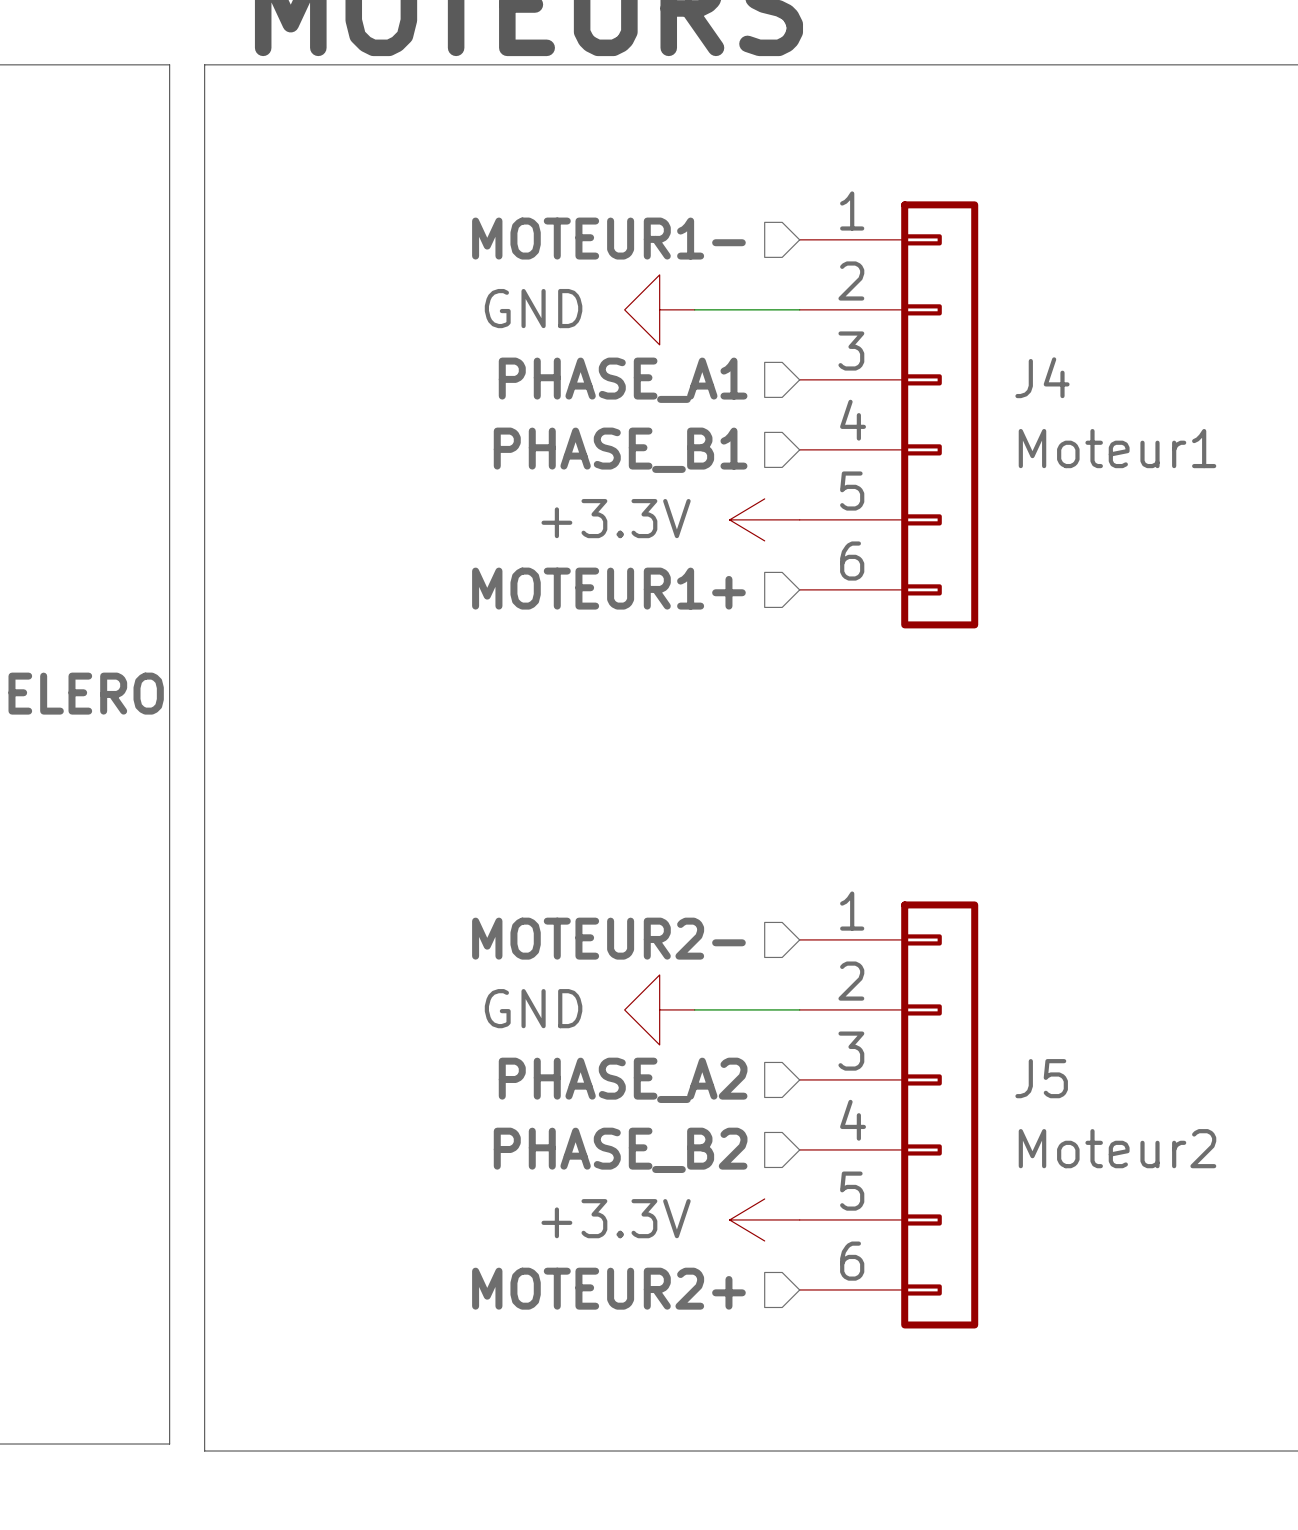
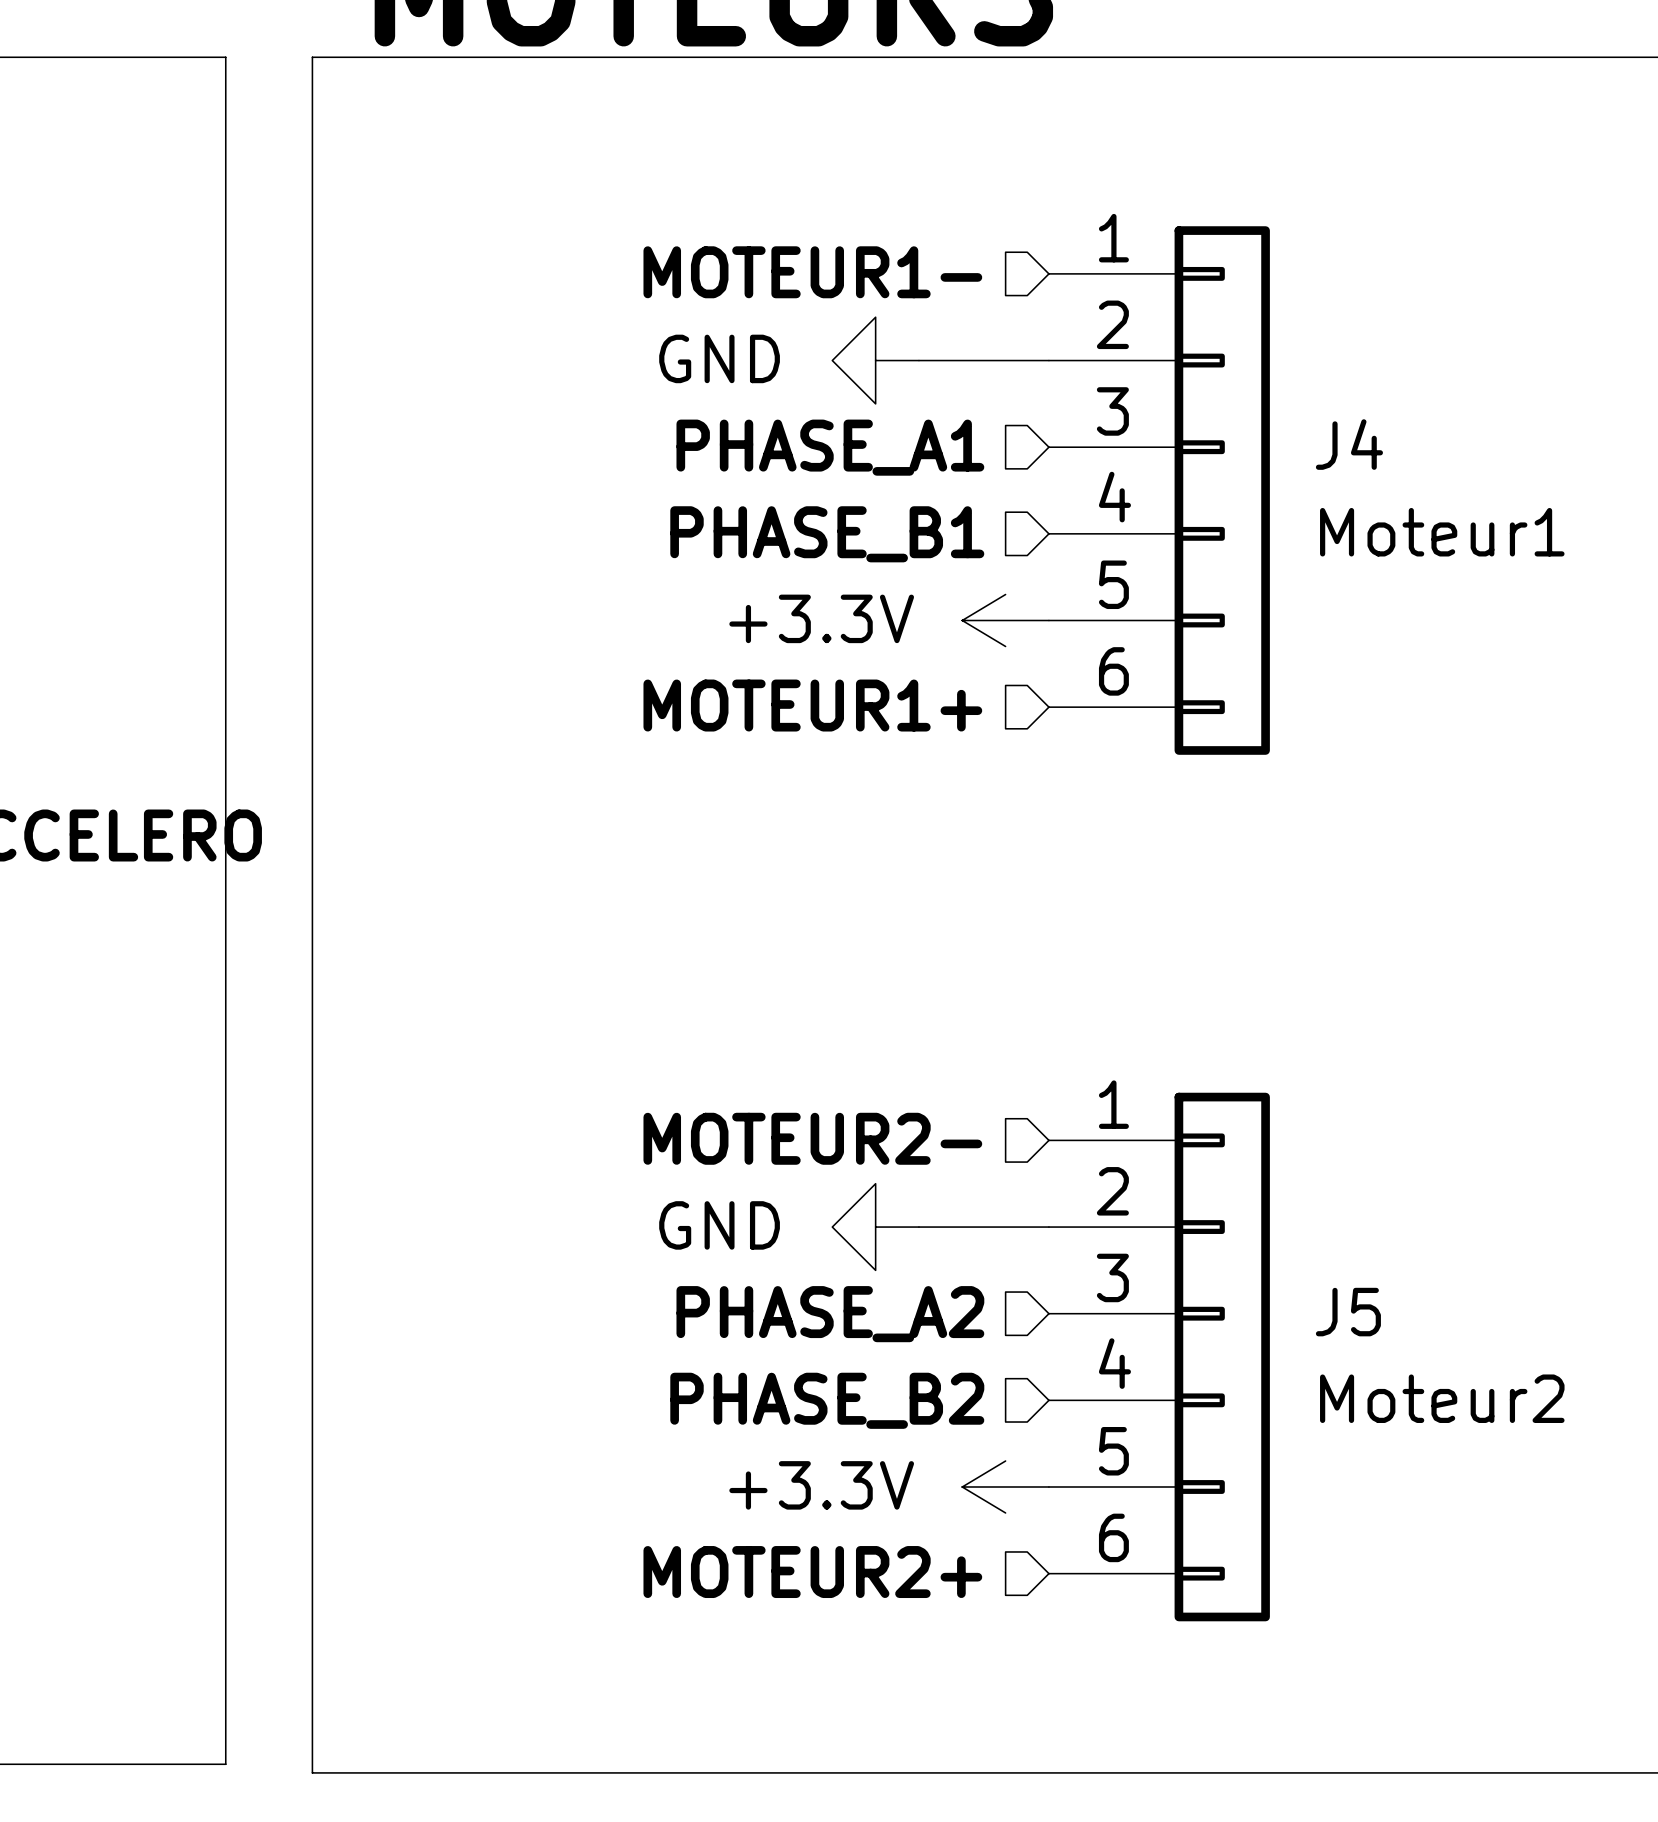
line: (134, 64) (169, 64) (169, 1444) (134, 1444) -> (225, 57) (225, 1764)

